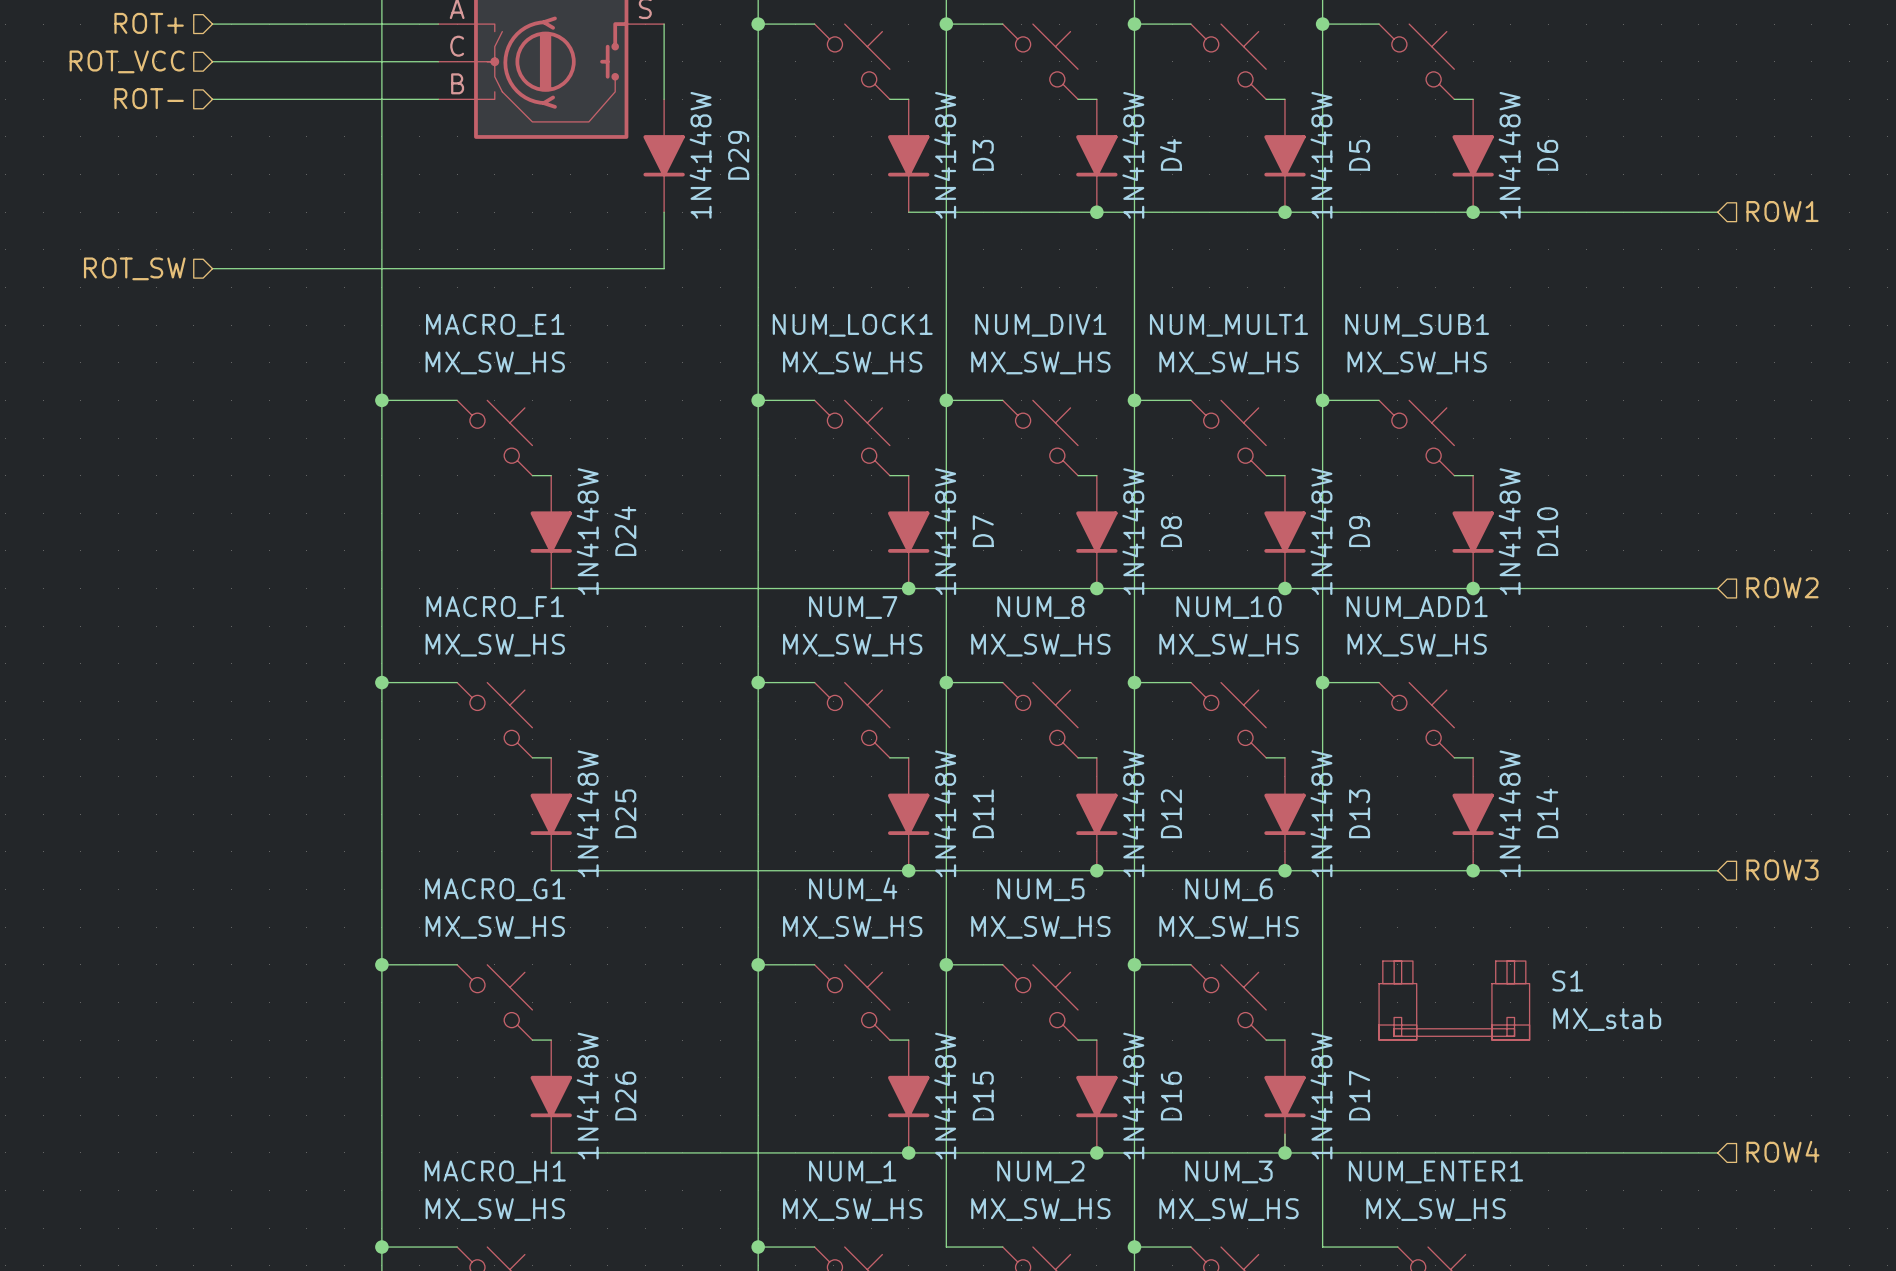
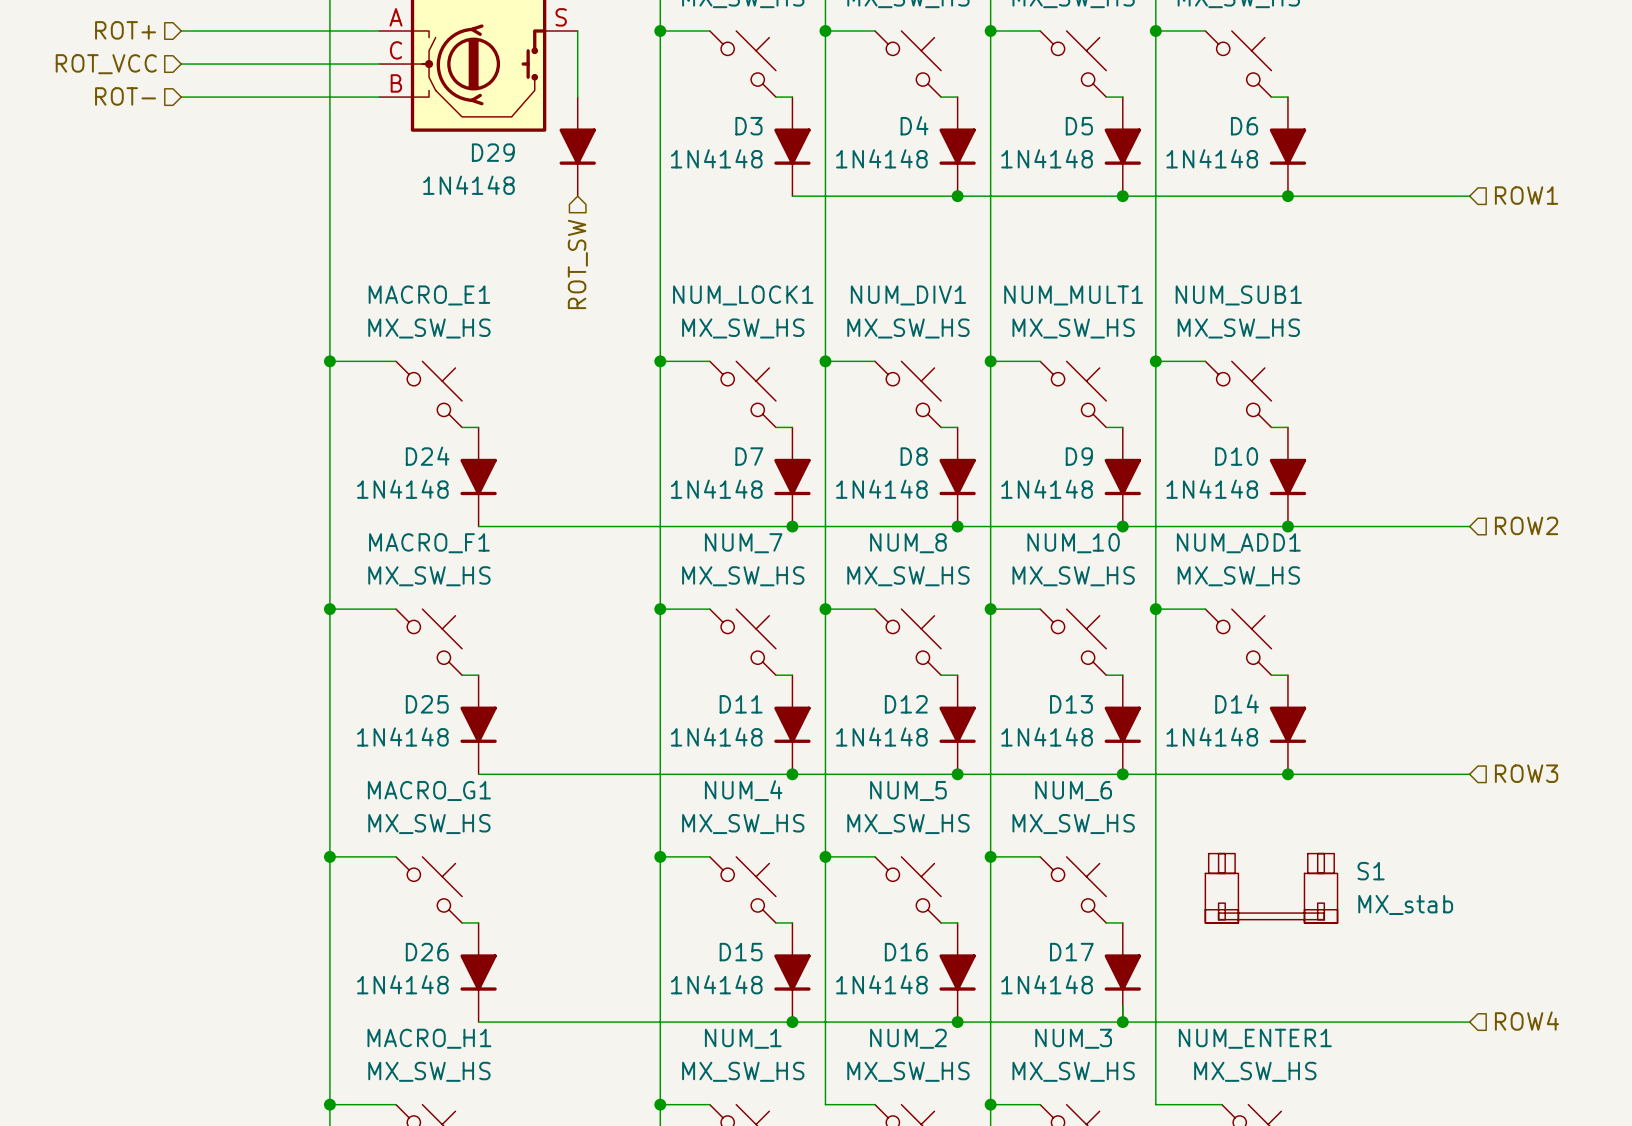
D4 name rotation: 0° (1170, 154) -> 90° clockwise (914, 125)
D4 name position: D4 (1170, 154) -> D4 (914, 125)
D29 value: 1N4148W (700, 155) -> 1N4148 (468, 185)
D29 name rotation: 0° (738, 155) -> 90° clockwise (493, 152)
D29 name position: D29 (738, 155) -> D29 (493, 152)
D3 value: 1N4148W (945, 155) -> 1N4148 (716, 158)
D3 name rotation: 0° (983, 155) -> 90° clockwise (748, 126)
D3 name position: D3 (983, 155) -> D3 (748, 126)
D4 value: 1N4148W (1133, 155) -> 1N4148 (881, 158)
D5 value: 1N4148W (1321, 155) -> 1N4148 (1047, 158)
D5 name rotation: 0° (1359, 155) -> 90° clockwise (1079, 126)
D5 name position: D5 (1359, 155) -> D5 (1079, 126)
D6 value: 1N4148W (1509, 155) -> 1N4148 (1212, 158)
D6 name rotation: 0° (1547, 155) -> 90° clockwise (1244, 126)
D6 name position: D6 (1547, 155) -> D6 (1244, 126)
hierarchical label position: ROW1 (1782, 211) -> ROW1 (1526, 195)
wire: (664, 212) (664, 268) (212, 268) -> none
wire: (1680, 212) (1717, 212) -> none
hierarchical label: ROT_SW (134, 268) -> none
hierarchical label: none -> ROT_SW (577, 264)
D24 value: 1N4148W (587, 531) -> 1N4148 (402, 489)
D24 name rotation: 0° (625, 531) -> 90° clockwise (427, 456)
D24 name position: D24 (625, 531) -> D24 (427, 456)
D7 value: 1N4148W (945, 531) -> 1N4148 (716, 489)
D7 name rotation: 0° (983, 531) -> 90° clockwise (749, 456)
D7 name position: D7 (983, 531) -> D7 (749, 456)
D8 value: 1N4148W (1133, 531) -> 1N4148 (881, 489)
D8 name rotation: 0° (1171, 531) -> 90° clockwise (914, 456)
D8 name position: D8 (1171, 531) -> D8 (914, 456)
D9 value: 1N4148W (1321, 531) -> 1N4148 (1047, 489)
D9 name rotation: 0° (1359, 531) -> 90° clockwise (1079, 456)
D9 name position: D9 (1359, 531) -> D9 (1079, 456)
D10 value: 1N4148W (1509, 531) -> 1N4148 (1212, 489)
D10 name rotation: 0° (1547, 531) -> 90° clockwise (1236, 456)
D10 name position: D10 (1547, 531) -> D10 (1236, 456)
hierarchical label position: ROW2 (1782, 587) -> ROW2 (1526, 525)
wire: (1680, 588) (1717, 588) -> none
D25 value: 1N4148W (587, 813) -> 1N4148 (402, 736)
D25 name rotation: 0° (625, 813) -> 90° clockwise (427, 704)
D25 name position: D25 (625, 813) -> D25 (427, 704)
D11 value: 1N4148W (945, 813) -> 1N4148 (716, 736)
D11 name rotation: 0° (983, 813) -> 90° clockwise (741, 704)
D11 name position: D11 (983, 813) -> D11 (741, 704)
D12 value: 1N4148W (1133, 813) -> 1N4148 (881, 736)
D12 name rotation: 0° (1171, 813) -> 90° clockwise (906, 704)
D12 name position: D12 (1171, 813) -> D12 (906, 704)
D13 value: 1N4148W (1321, 813) -> 1N4148 (1047, 736)
D13 name rotation: 0° (1359, 813) -> 90° clockwise (1071, 704)
D13 name position: D13 (1359, 813) -> D13 (1071, 704)
D14 value: 1N4148W (1509, 813) -> 1N4148 (1212, 736)
D14 name rotation: 0° (1547, 813) -> 90° clockwise (1237, 703)
D14 name position: D14 (1547, 813) -> D14 (1237, 703)
wire: (1680, 870) (1717, 870) -> none
hierarchical label position: ROW3 (1782, 870) -> ROW3 (1526, 773)
D17 name rotation: 0° (1359, 1095) -> 90° clockwise (1071, 952)
D17 name position: D17 (1359, 1095) -> D17 (1071, 952)
D26 value: 1N4148W (587, 1096) -> 1N4148 (402, 984)
D26 name rotation: 0° (625, 1096) -> 90° clockwise (427, 952)
D26 name position: D26 (625, 1096) -> D26 (427, 952)
D15 value: 1N4148W (945, 1096) -> 1N4148 (716, 984)
D15 name rotation: 0° (983, 1096) -> 90° clockwise (741, 952)
D15 name position: D15 (983, 1096) -> D15 (741, 952)
D16 value: 1N4148W (1133, 1096) -> 1N4148 (881, 984)
D16 name rotation: 0° (1171, 1096) -> 90° clockwise (906, 952)
D16 name position: D16 (1171, 1096) -> D16 (906, 952)
D17 value: 1N4148W (1321, 1096) -> 1N4148 (1047, 984)
hierarchical label position: ROW4 (1782, 1151) -> ROW4 (1526, 1021)
wire: (1680, 1152) (1717, 1152) -> none

